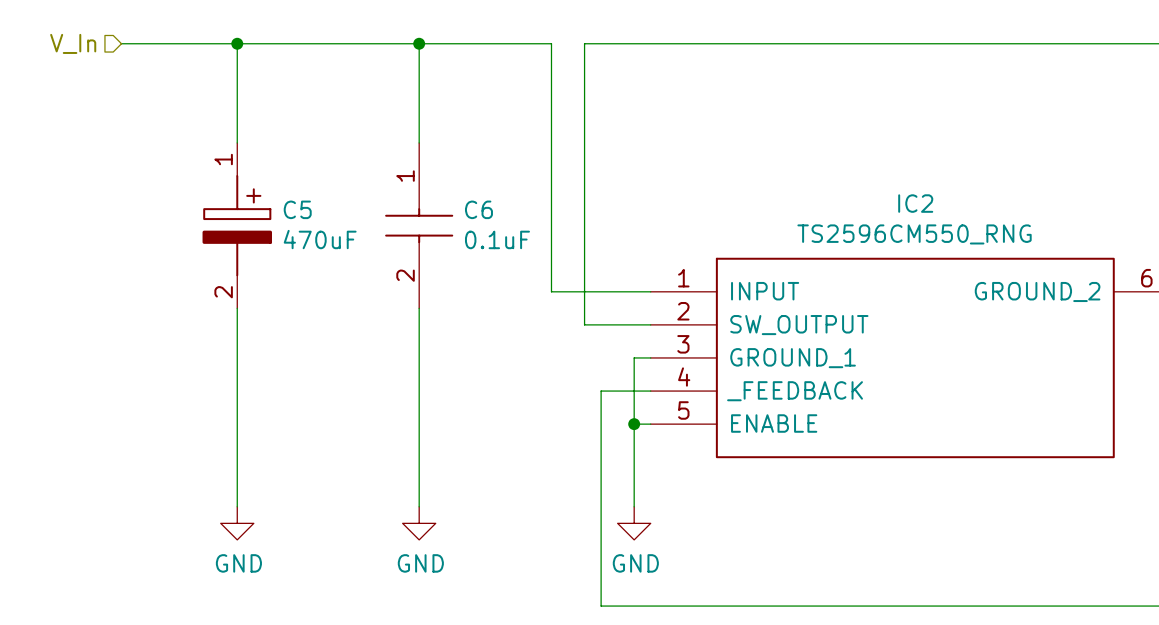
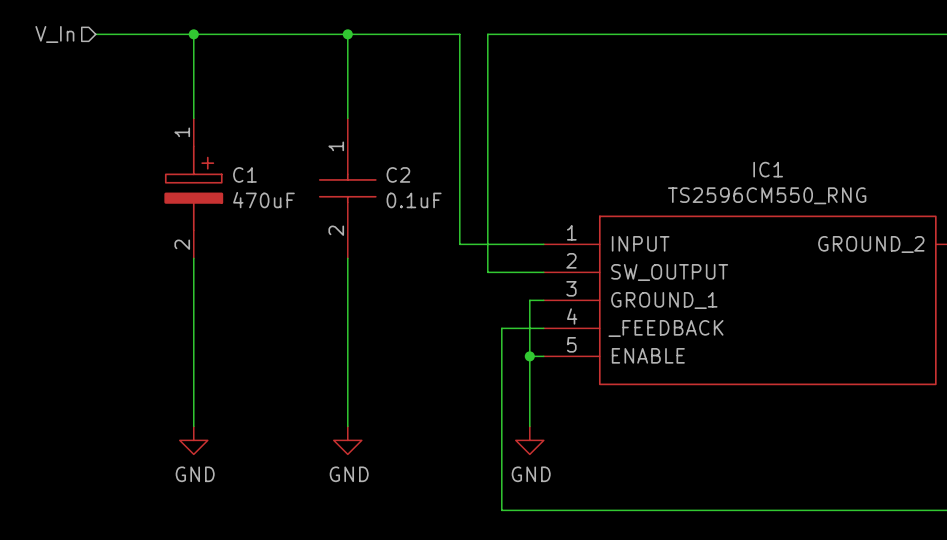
IC2 name: IC2 (915, 203) -> IC1 (768, 169)
C5 name: C5 (297, 209) -> C1 (244, 174)
C6 name: C6 (478, 209) -> C2 (398, 174)

